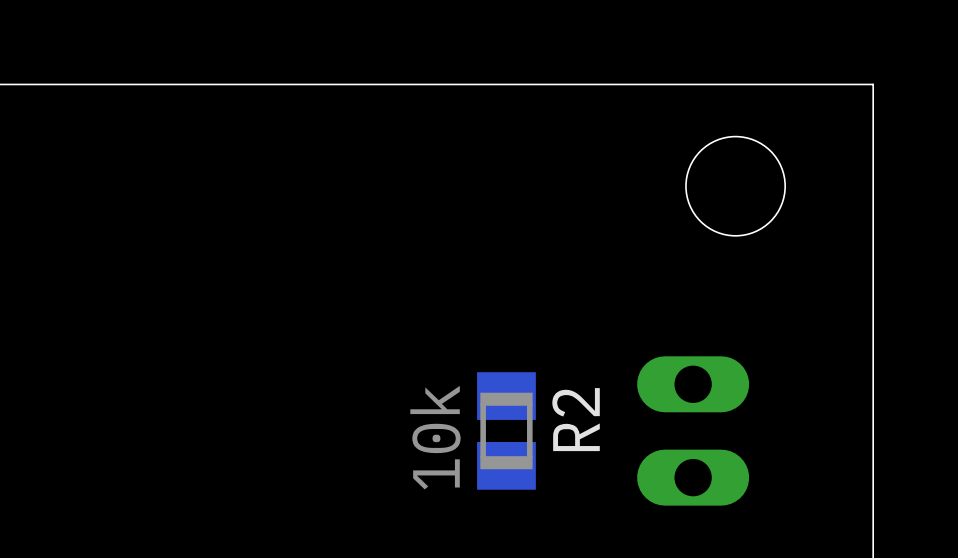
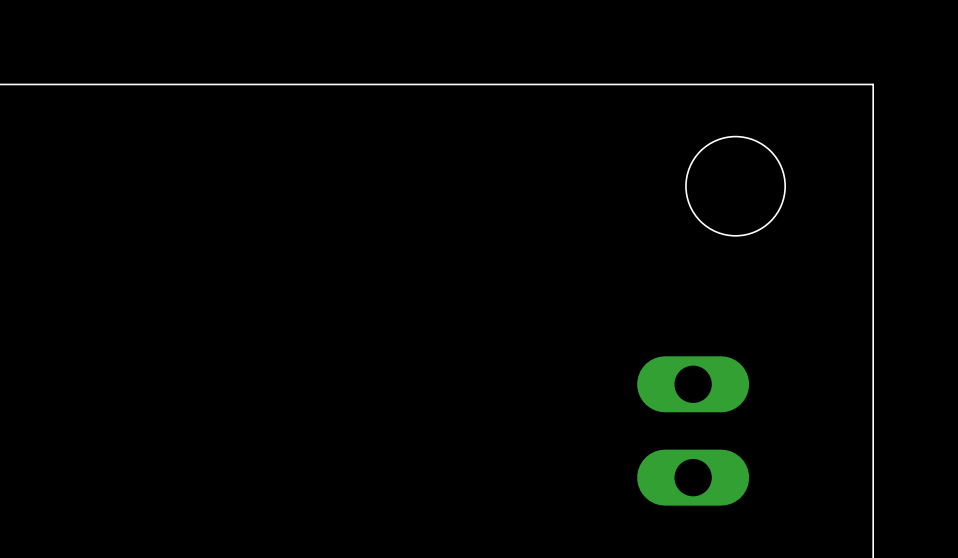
R2: 10k (506, 430) -> none

